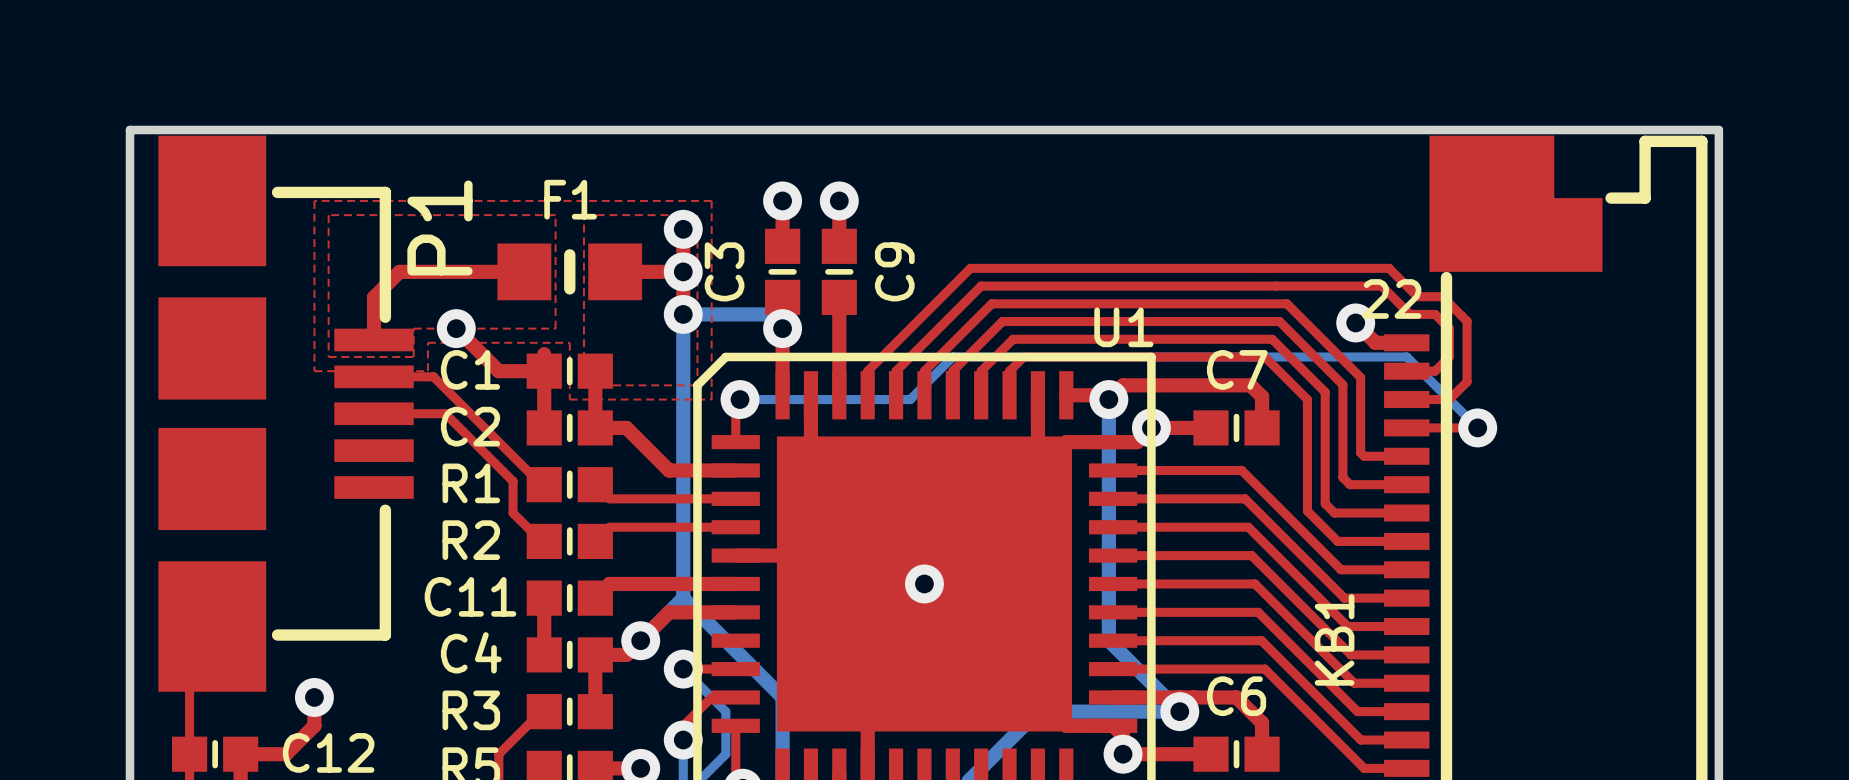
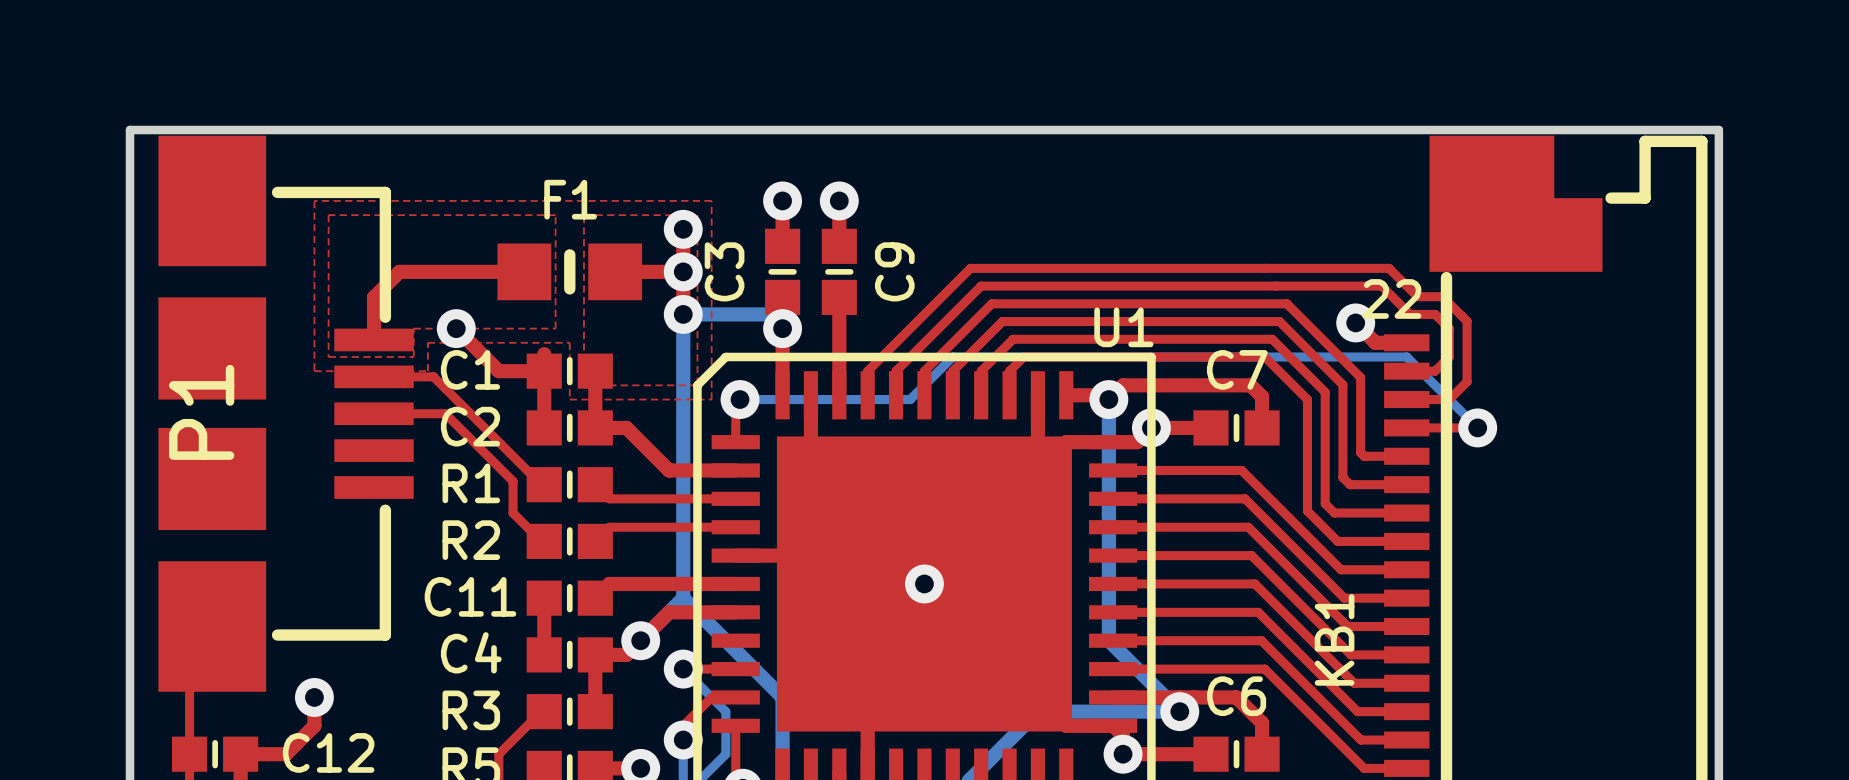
P1 name position: P1 (439, 227) -> P1 (201, 412)

